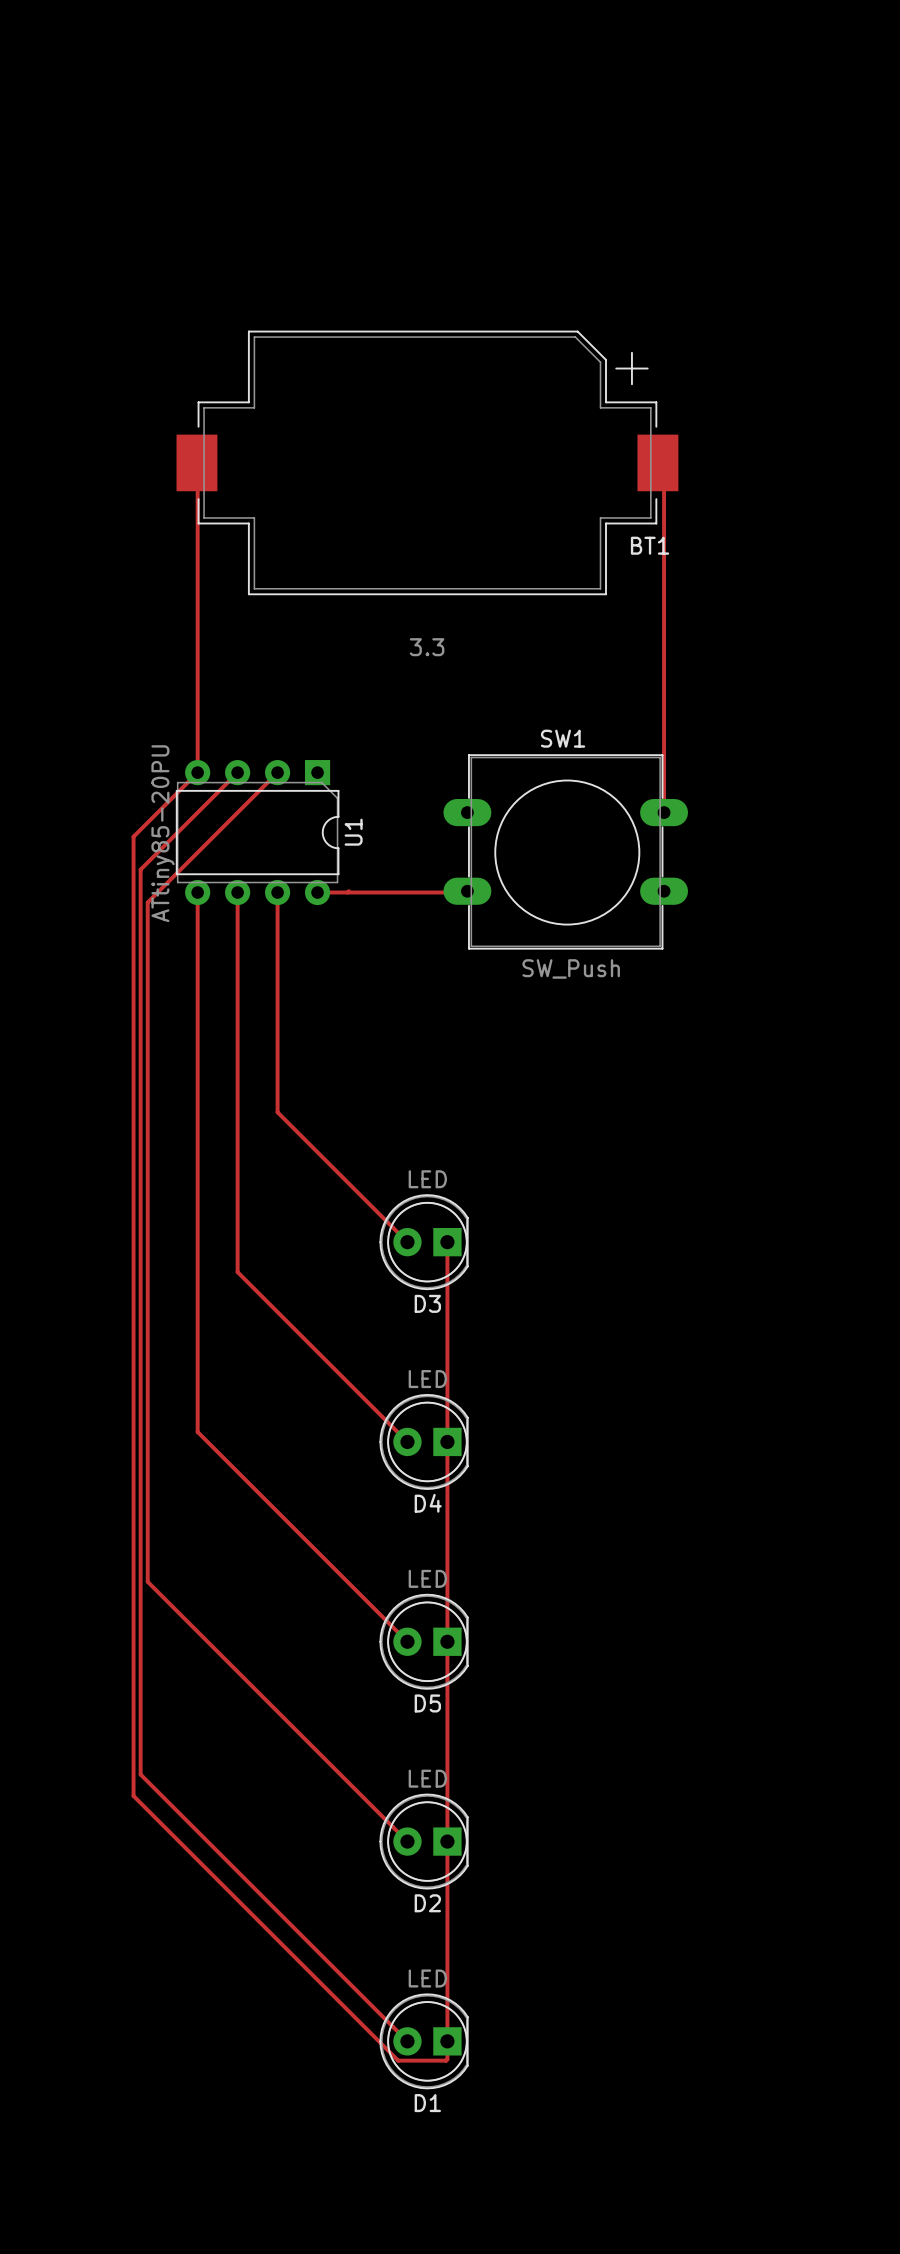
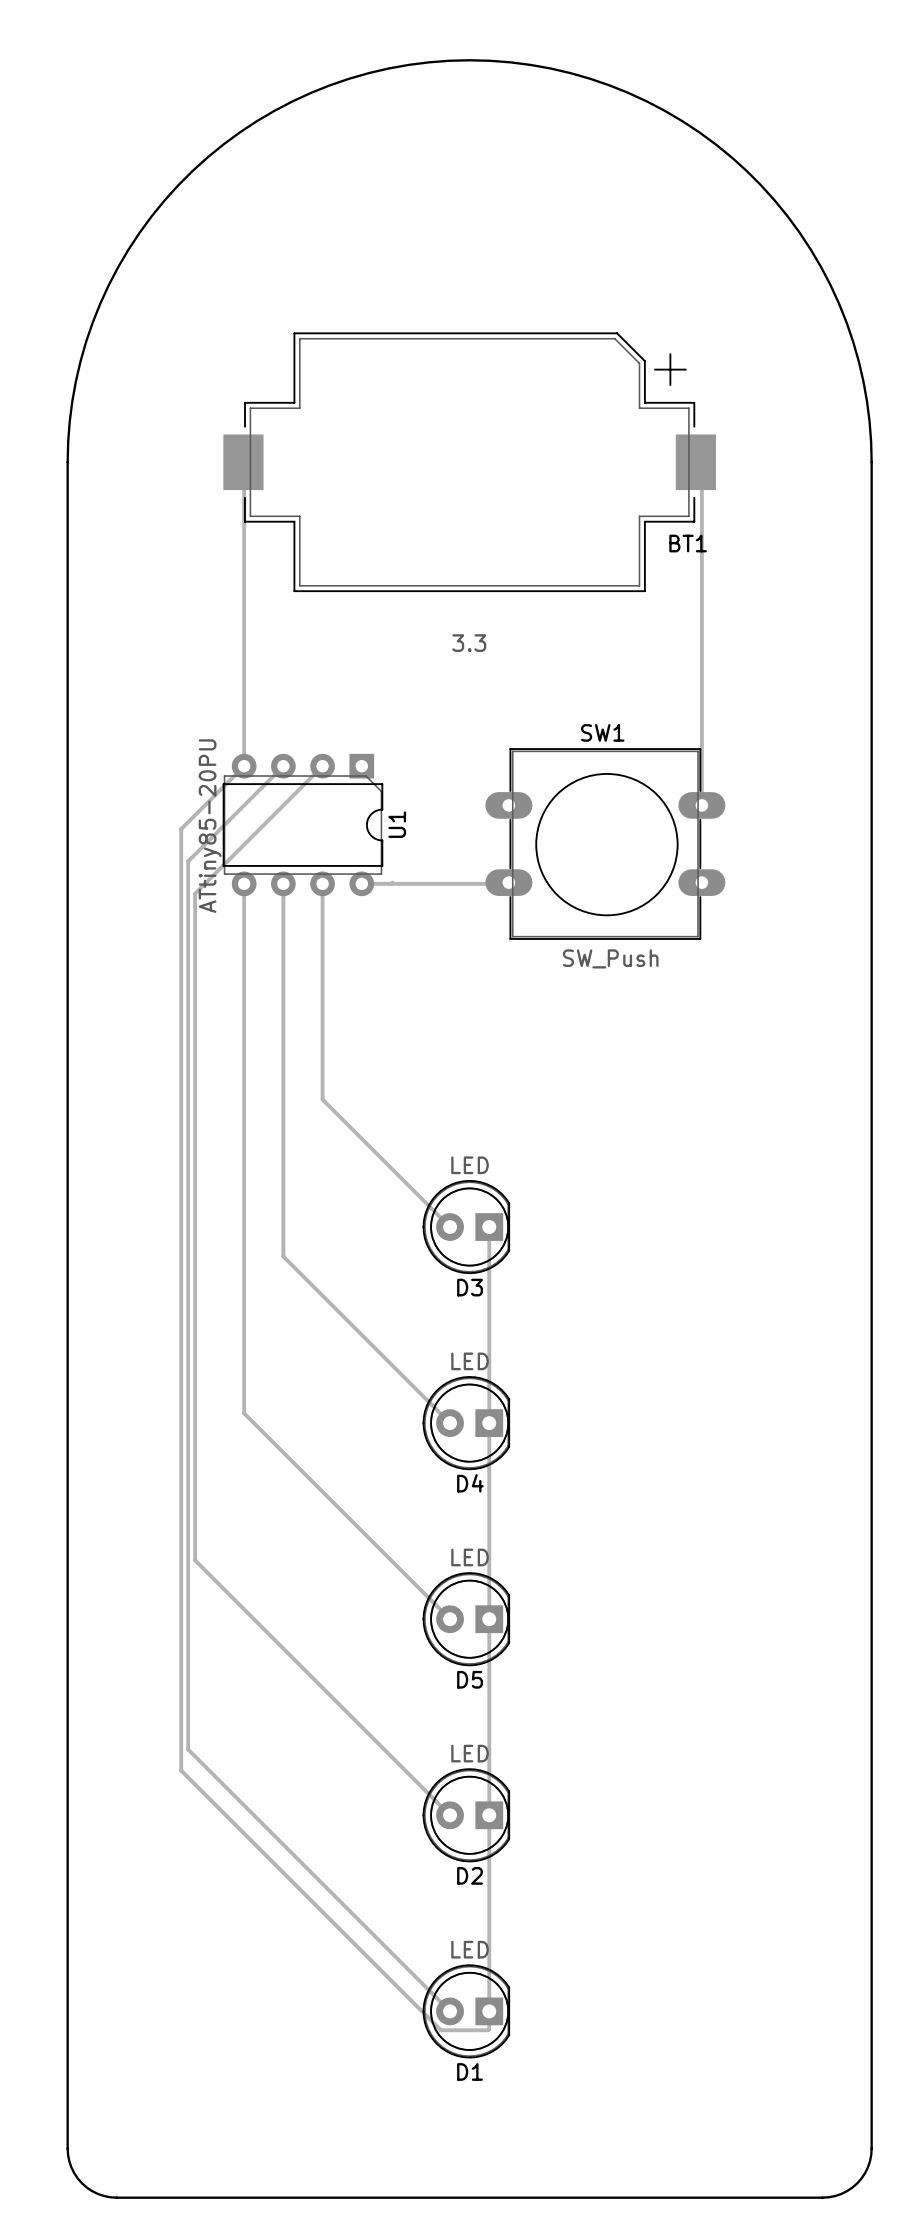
board edge: none -> (67, 462) (67, 2148) (71, 2167) (77, 2178) (92, 2191) (104, 2196) (116, 2197) (822, 2197) (841, 2193) (852, 2187) (865, 2173) (869, 2161) (871, 2148) (871, 462) (869, 421) (863, 381) (853, 341) (839, 303) (810, 249) (787, 216) (761, 185) (715, 144) (664, 110) (609, 85) (570, 73) (530, 64) (469, 60) (428, 62) (388, 68) (349, 78) (311, 92) (257, 121) (207, 157) (164, 200) (139, 232) (118, 267) (92, 322) (75, 381) (69, 421) (67, 462)

